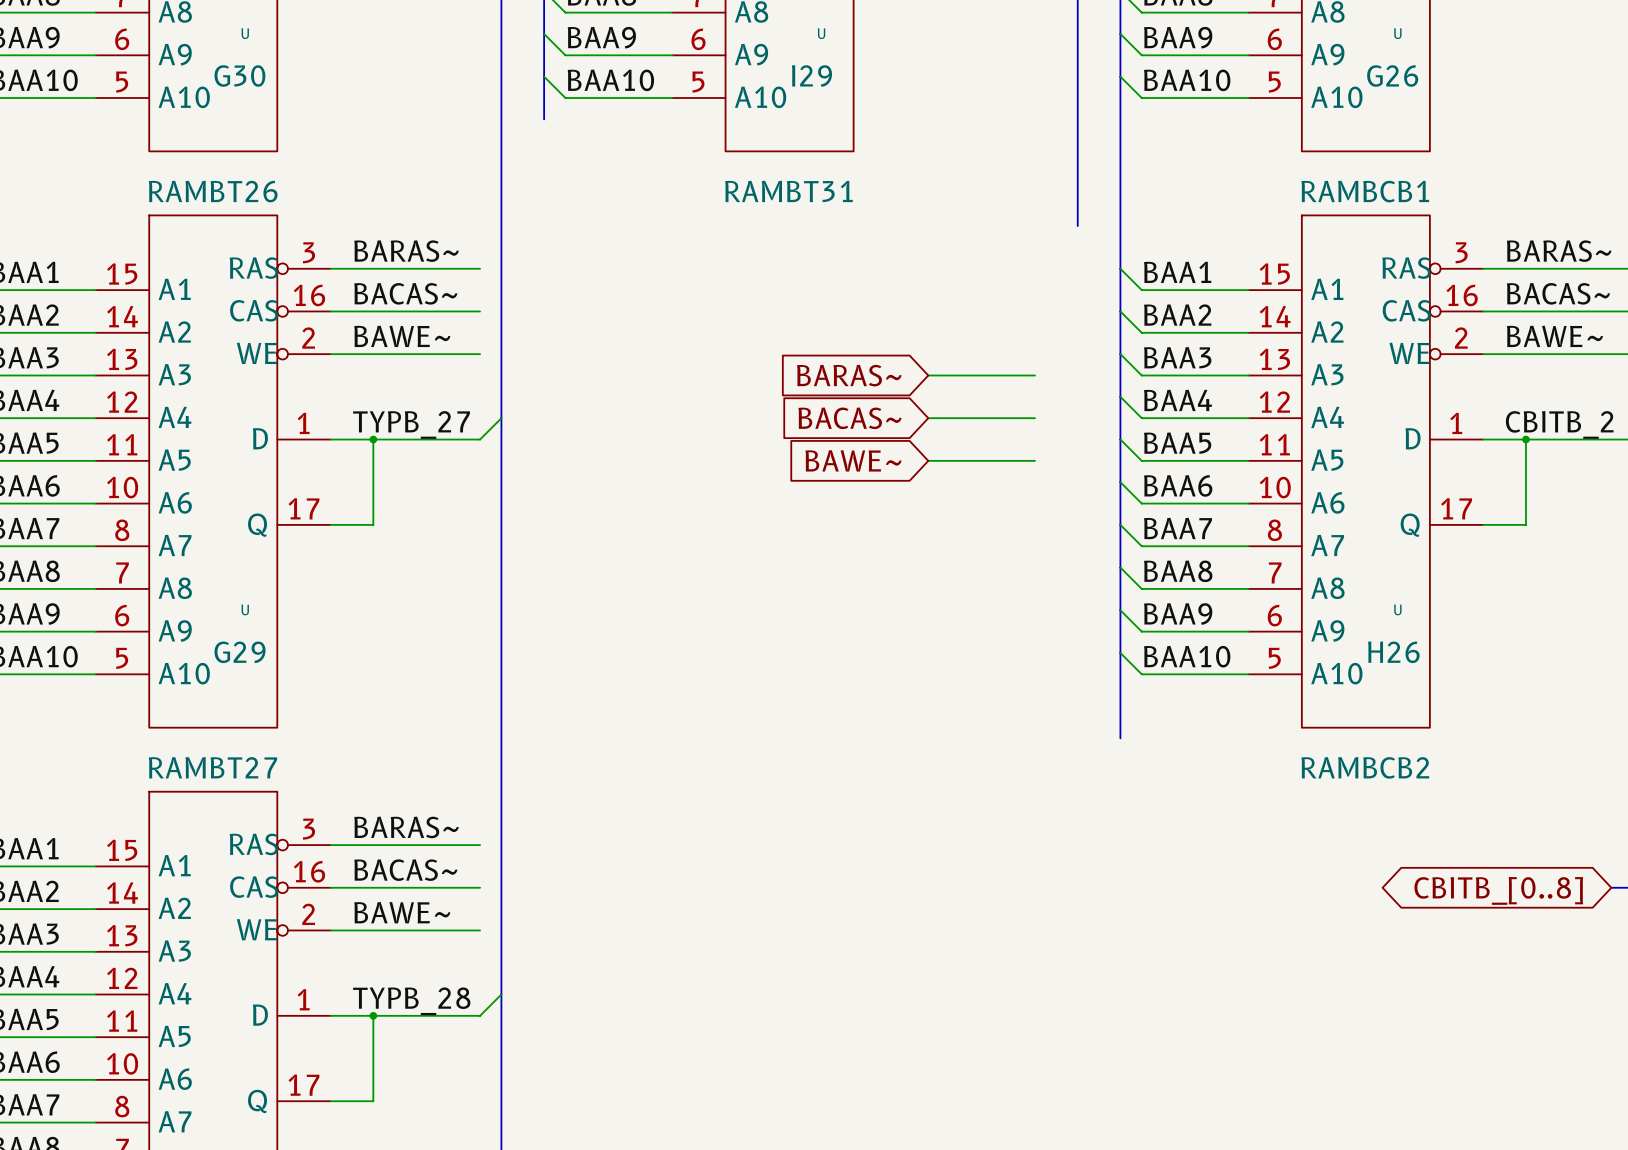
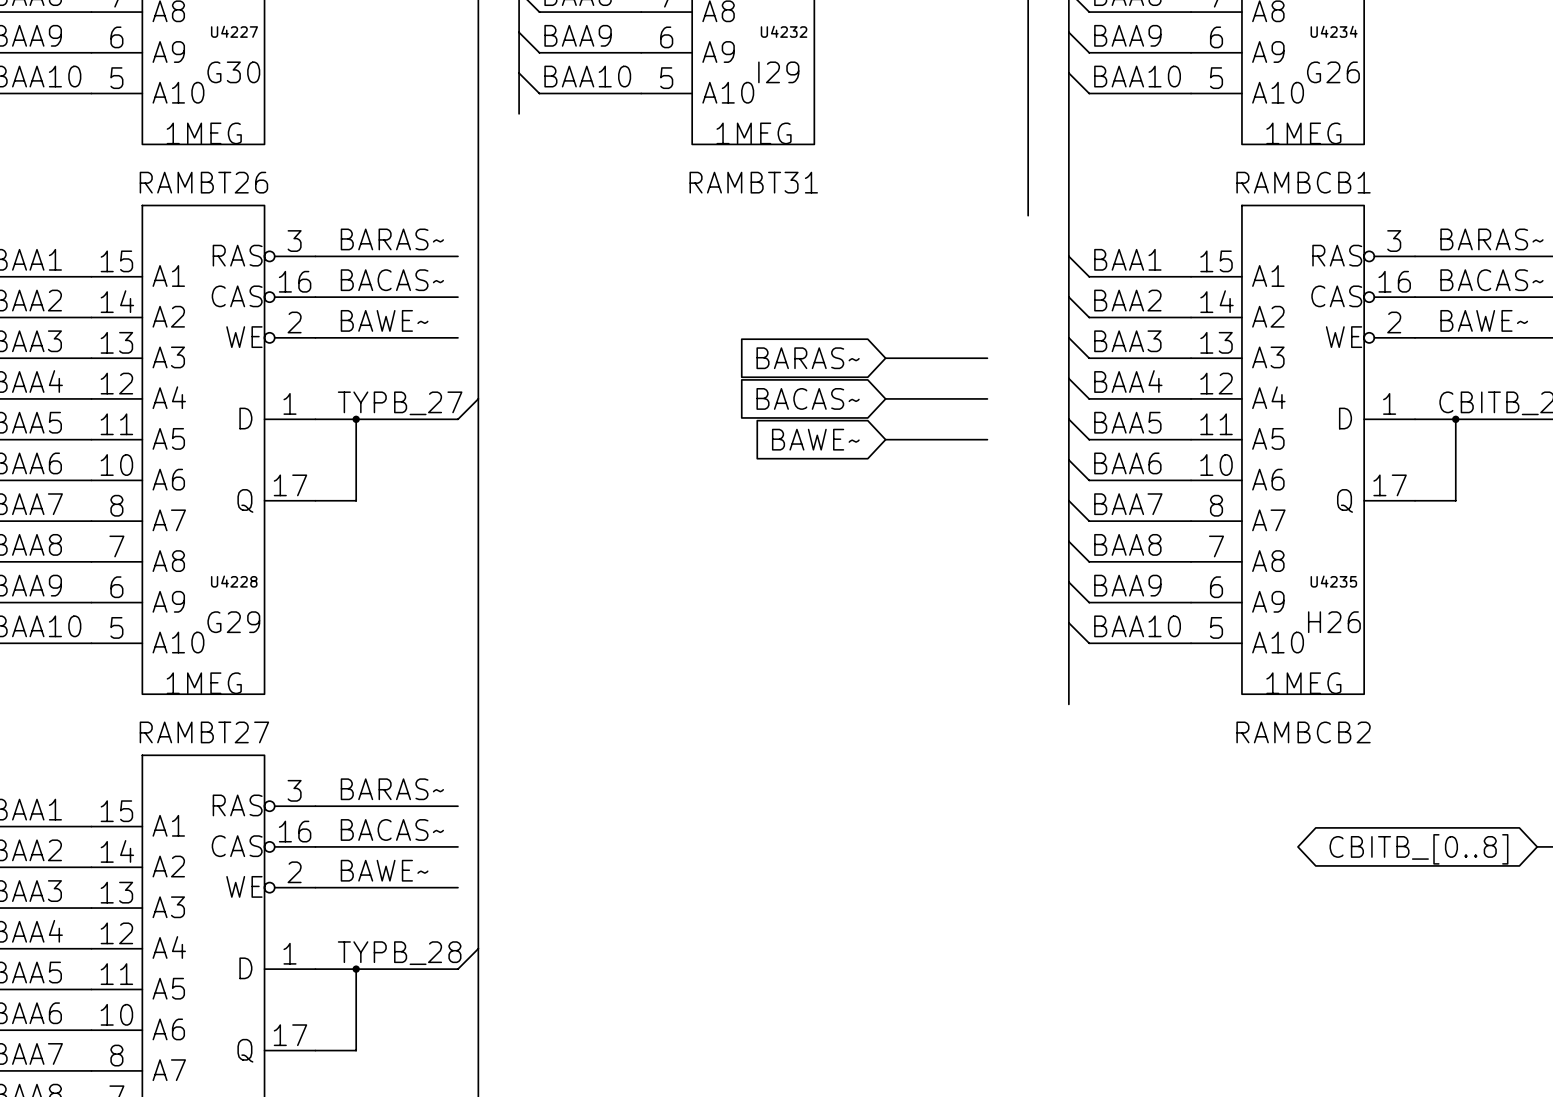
U name: U (245, 33) -> U4227 (234, 31)
U name: U (821, 33) -> U4232 (784, 31)
U name: U (1397, 33) -> U4234 (1334, 31)
U value: none -> 1MEG (204, 133)
U value: none -> 1MEG (754, 133)
U value: none -> 1MEG (1303, 133)
U name: U (245, 609) -> U4228 (234, 581)
U name: U (1397, 609) -> U4235 (1333, 581)
U value: none -> 1MEG (204, 683)
U value: none -> 1MEG (1303, 683)

